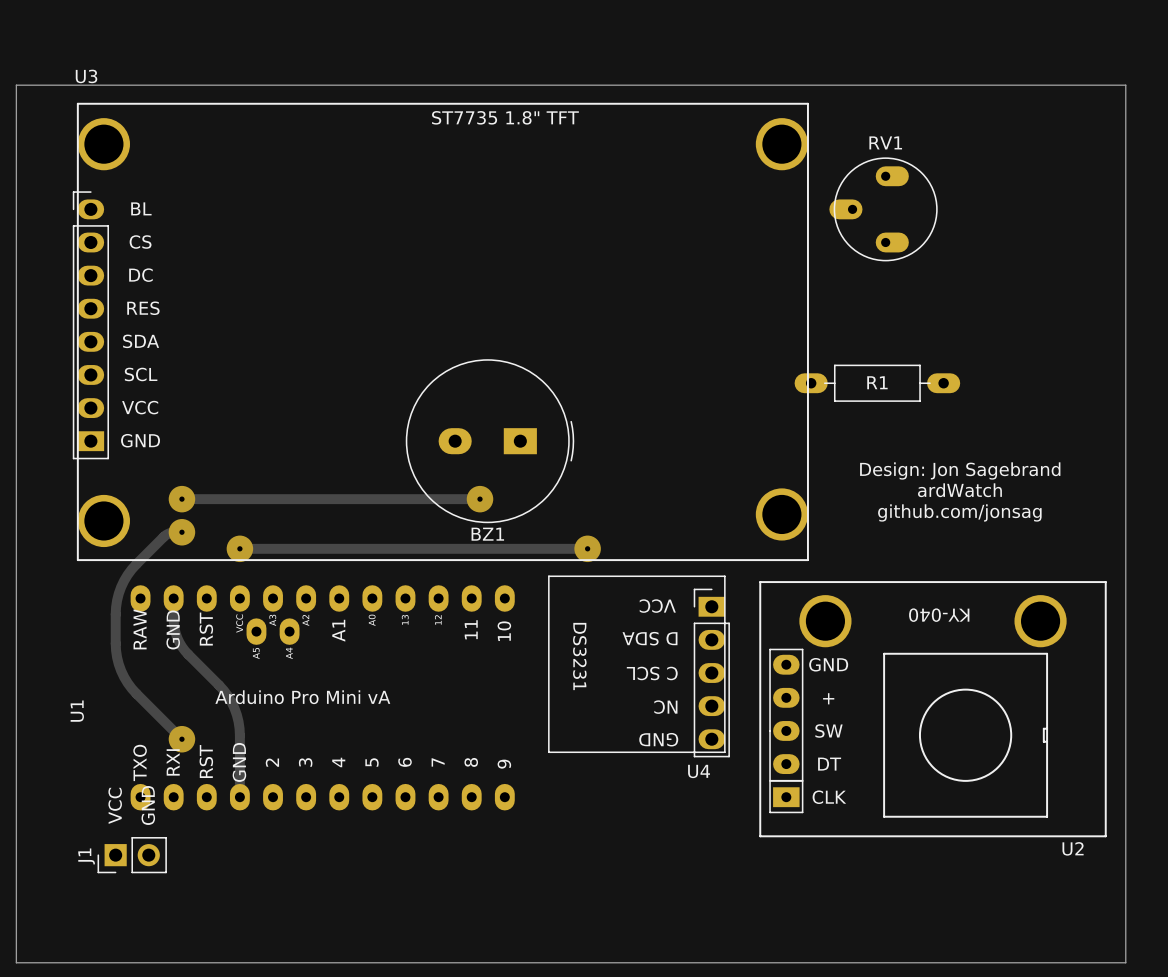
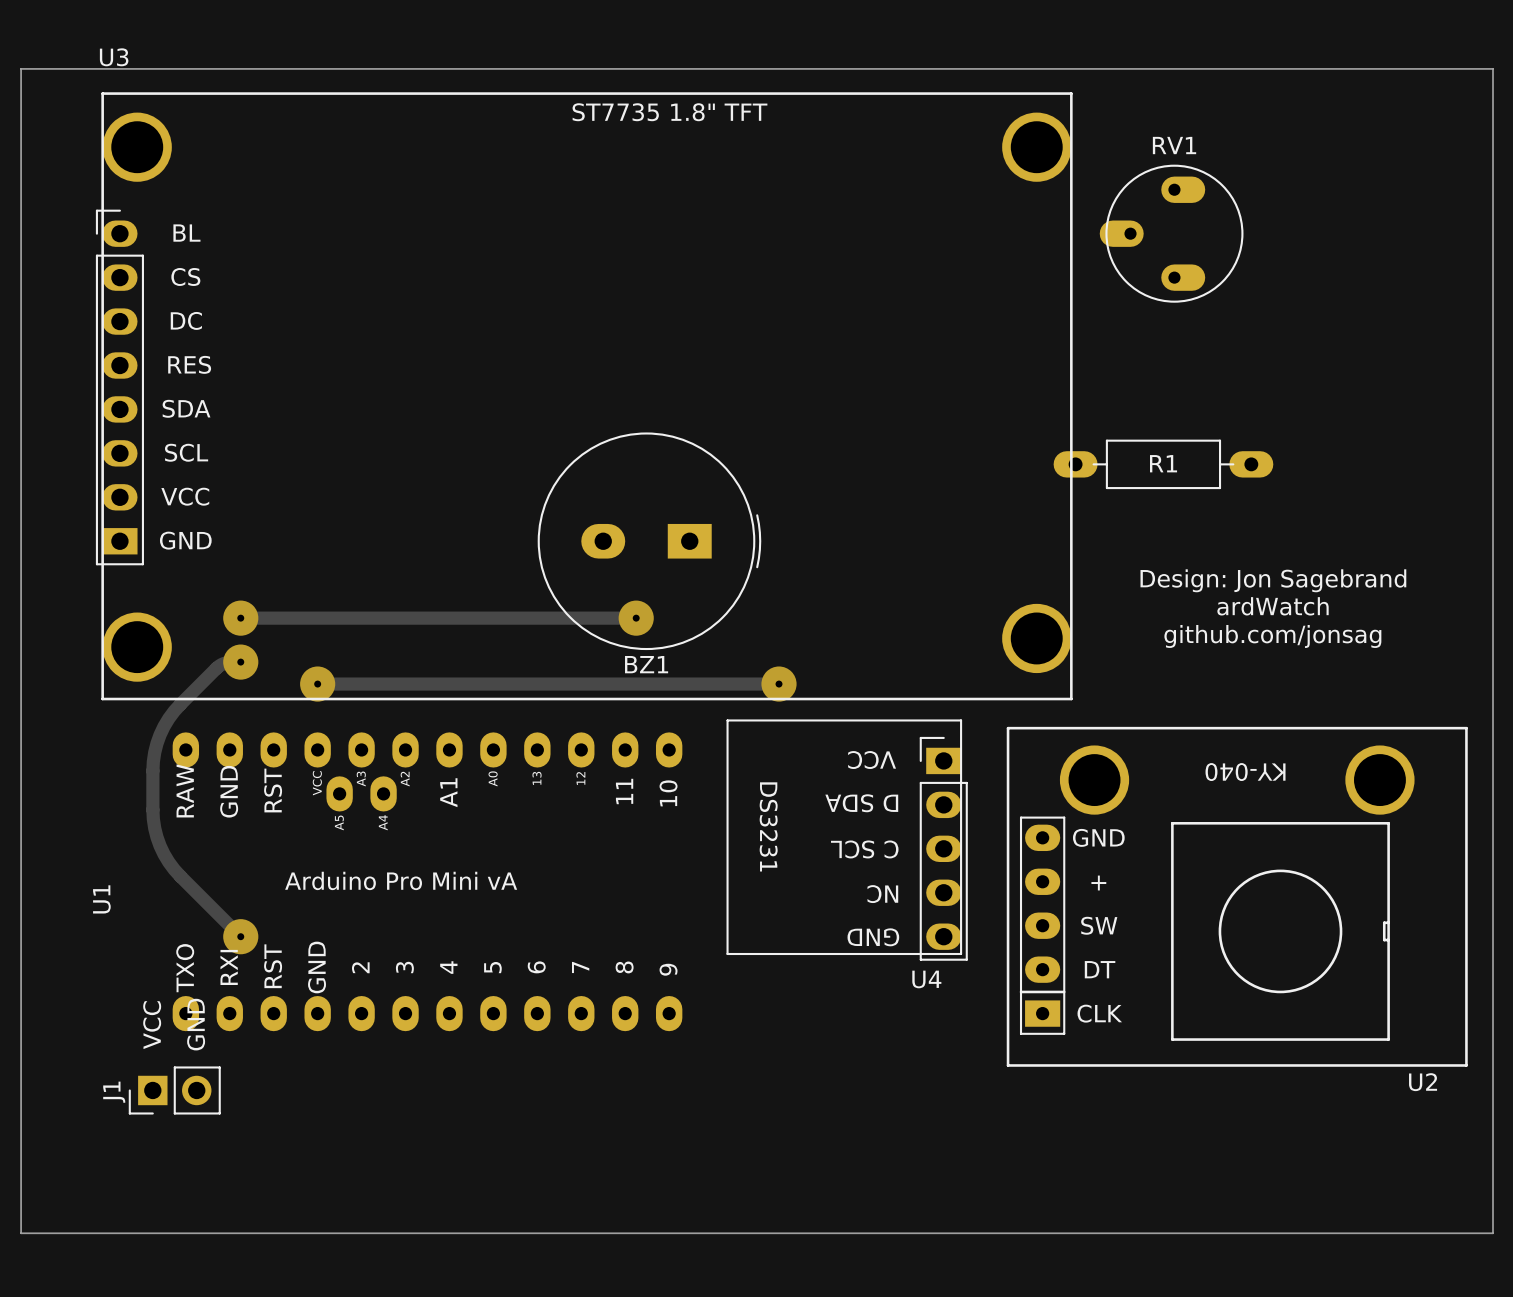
track: (173, 598) (173, 624) (179, 642) (188, 654) (223, 690) (236, 714) (239, 735) (239, 797) -> none

